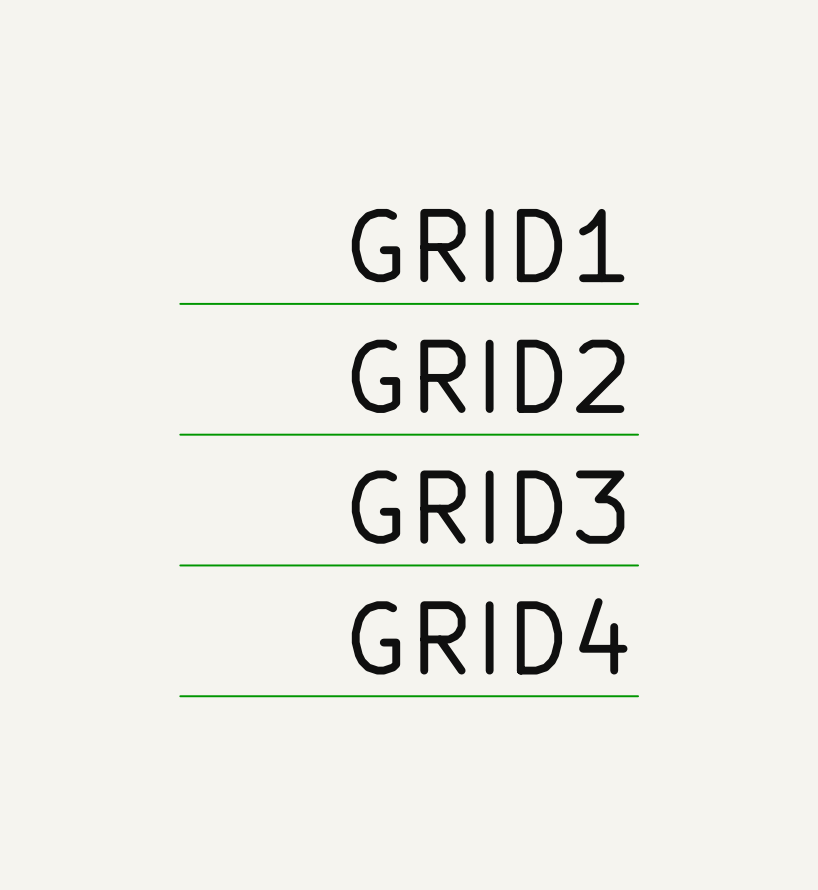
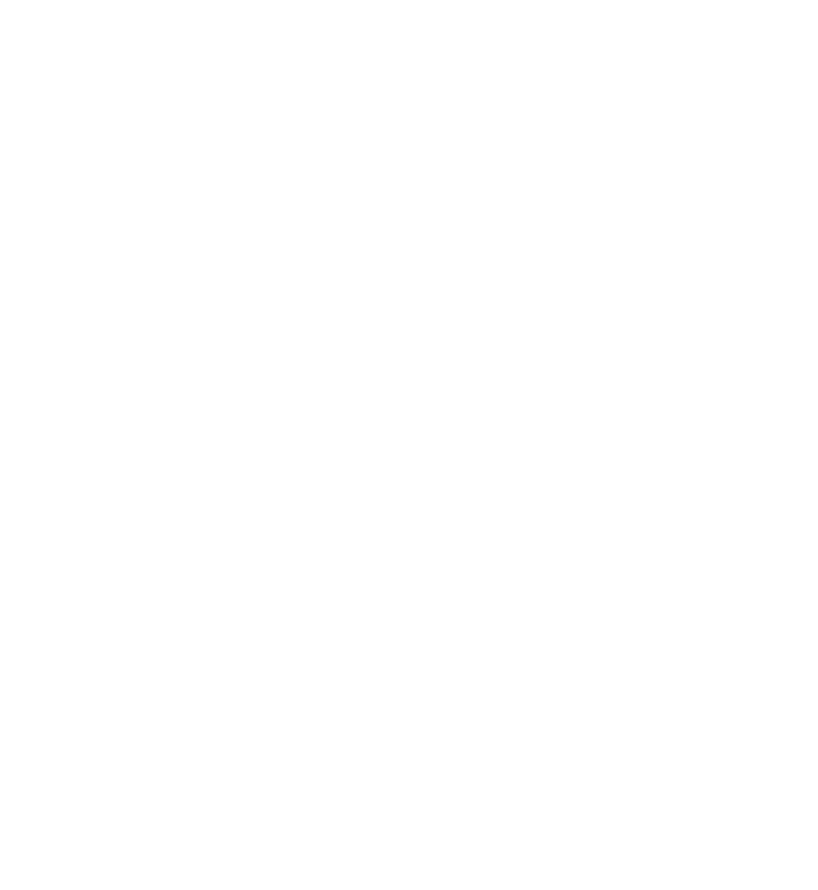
label: GRID1 (488, 245) -> none
wire: (180, 303) (638, 303) -> none
label: GRID2 (488, 376) -> none
wire: (180, 434) (638, 434) -> none
label: GRID3 (488, 507) -> none
wire: (180, 565) (638, 565) -> none
label: GRID4 (489, 636) -> none
wire: (180, 696) (638, 696) -> none

